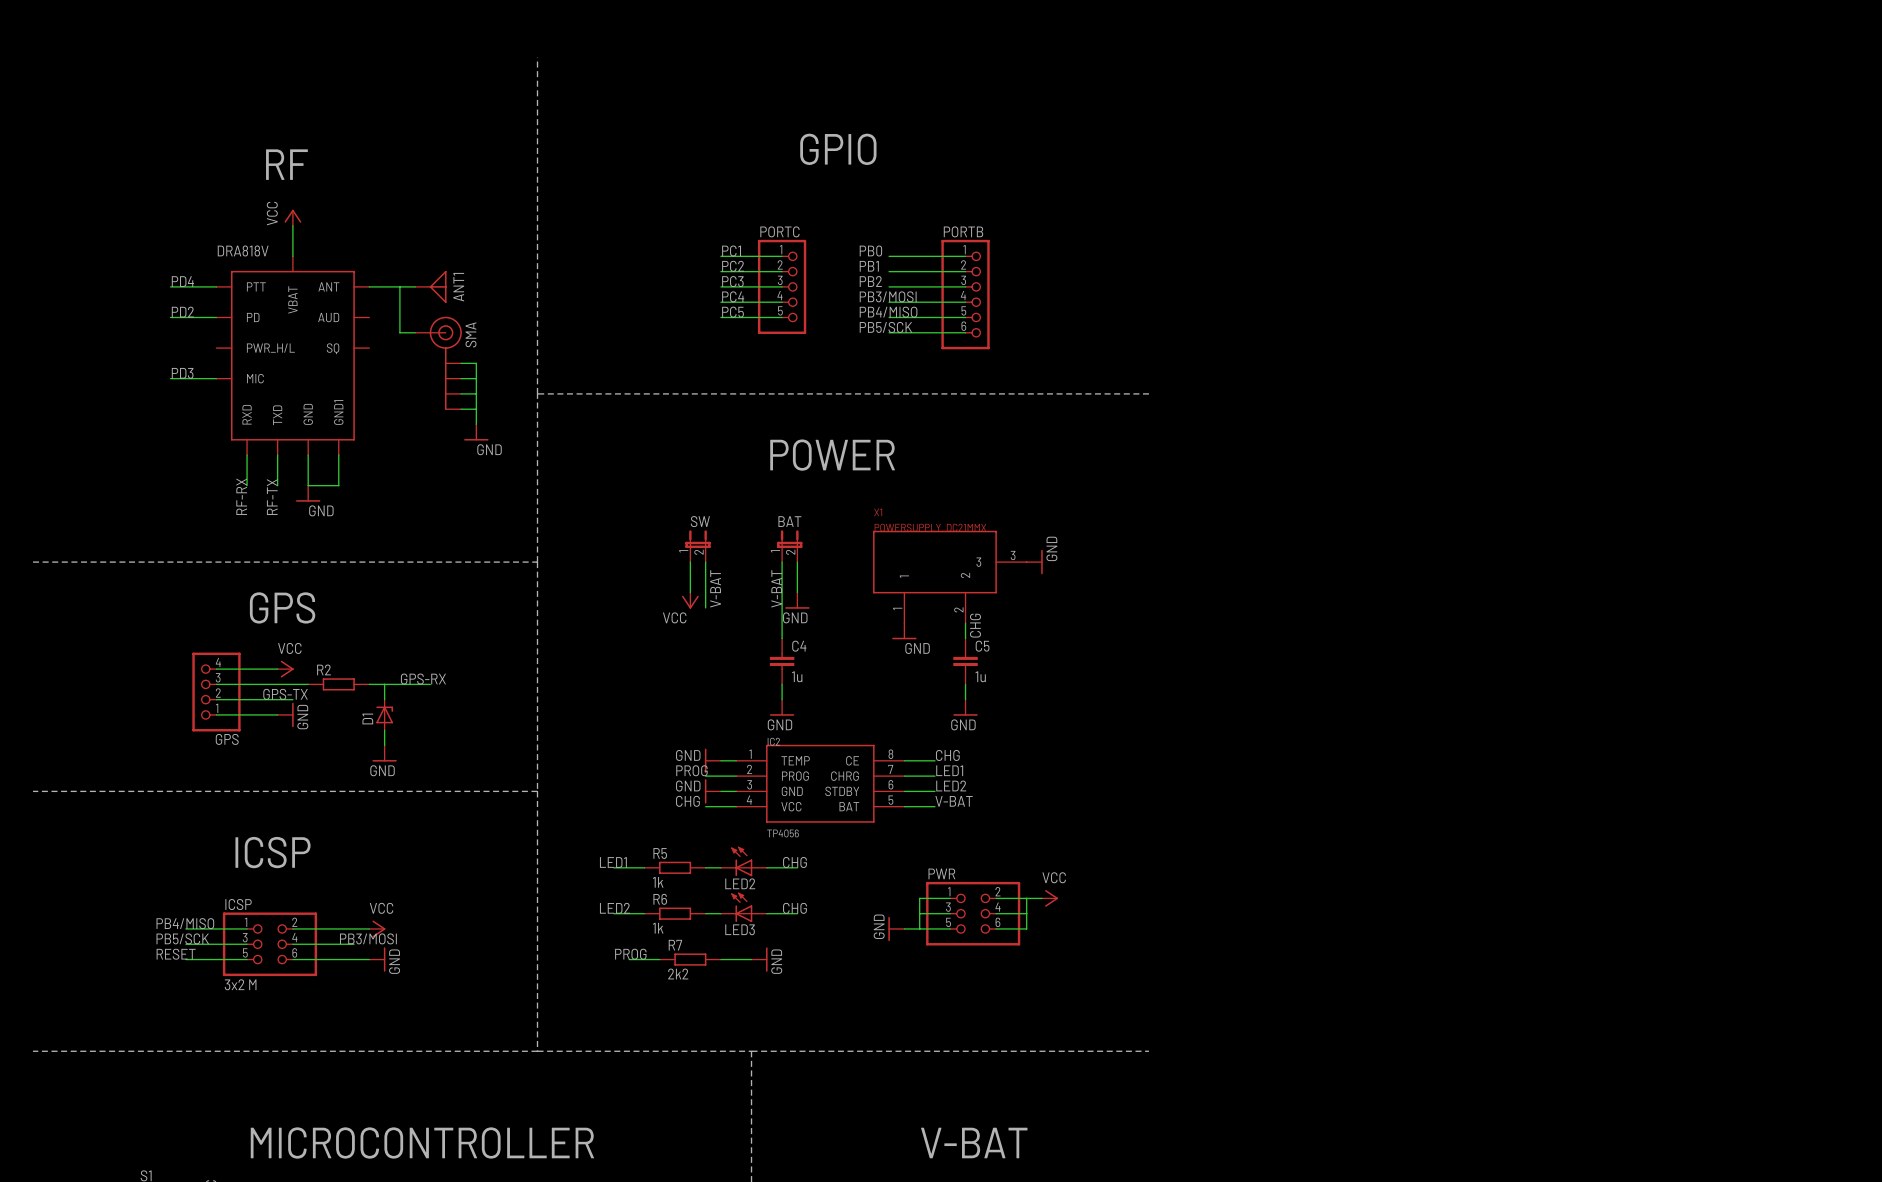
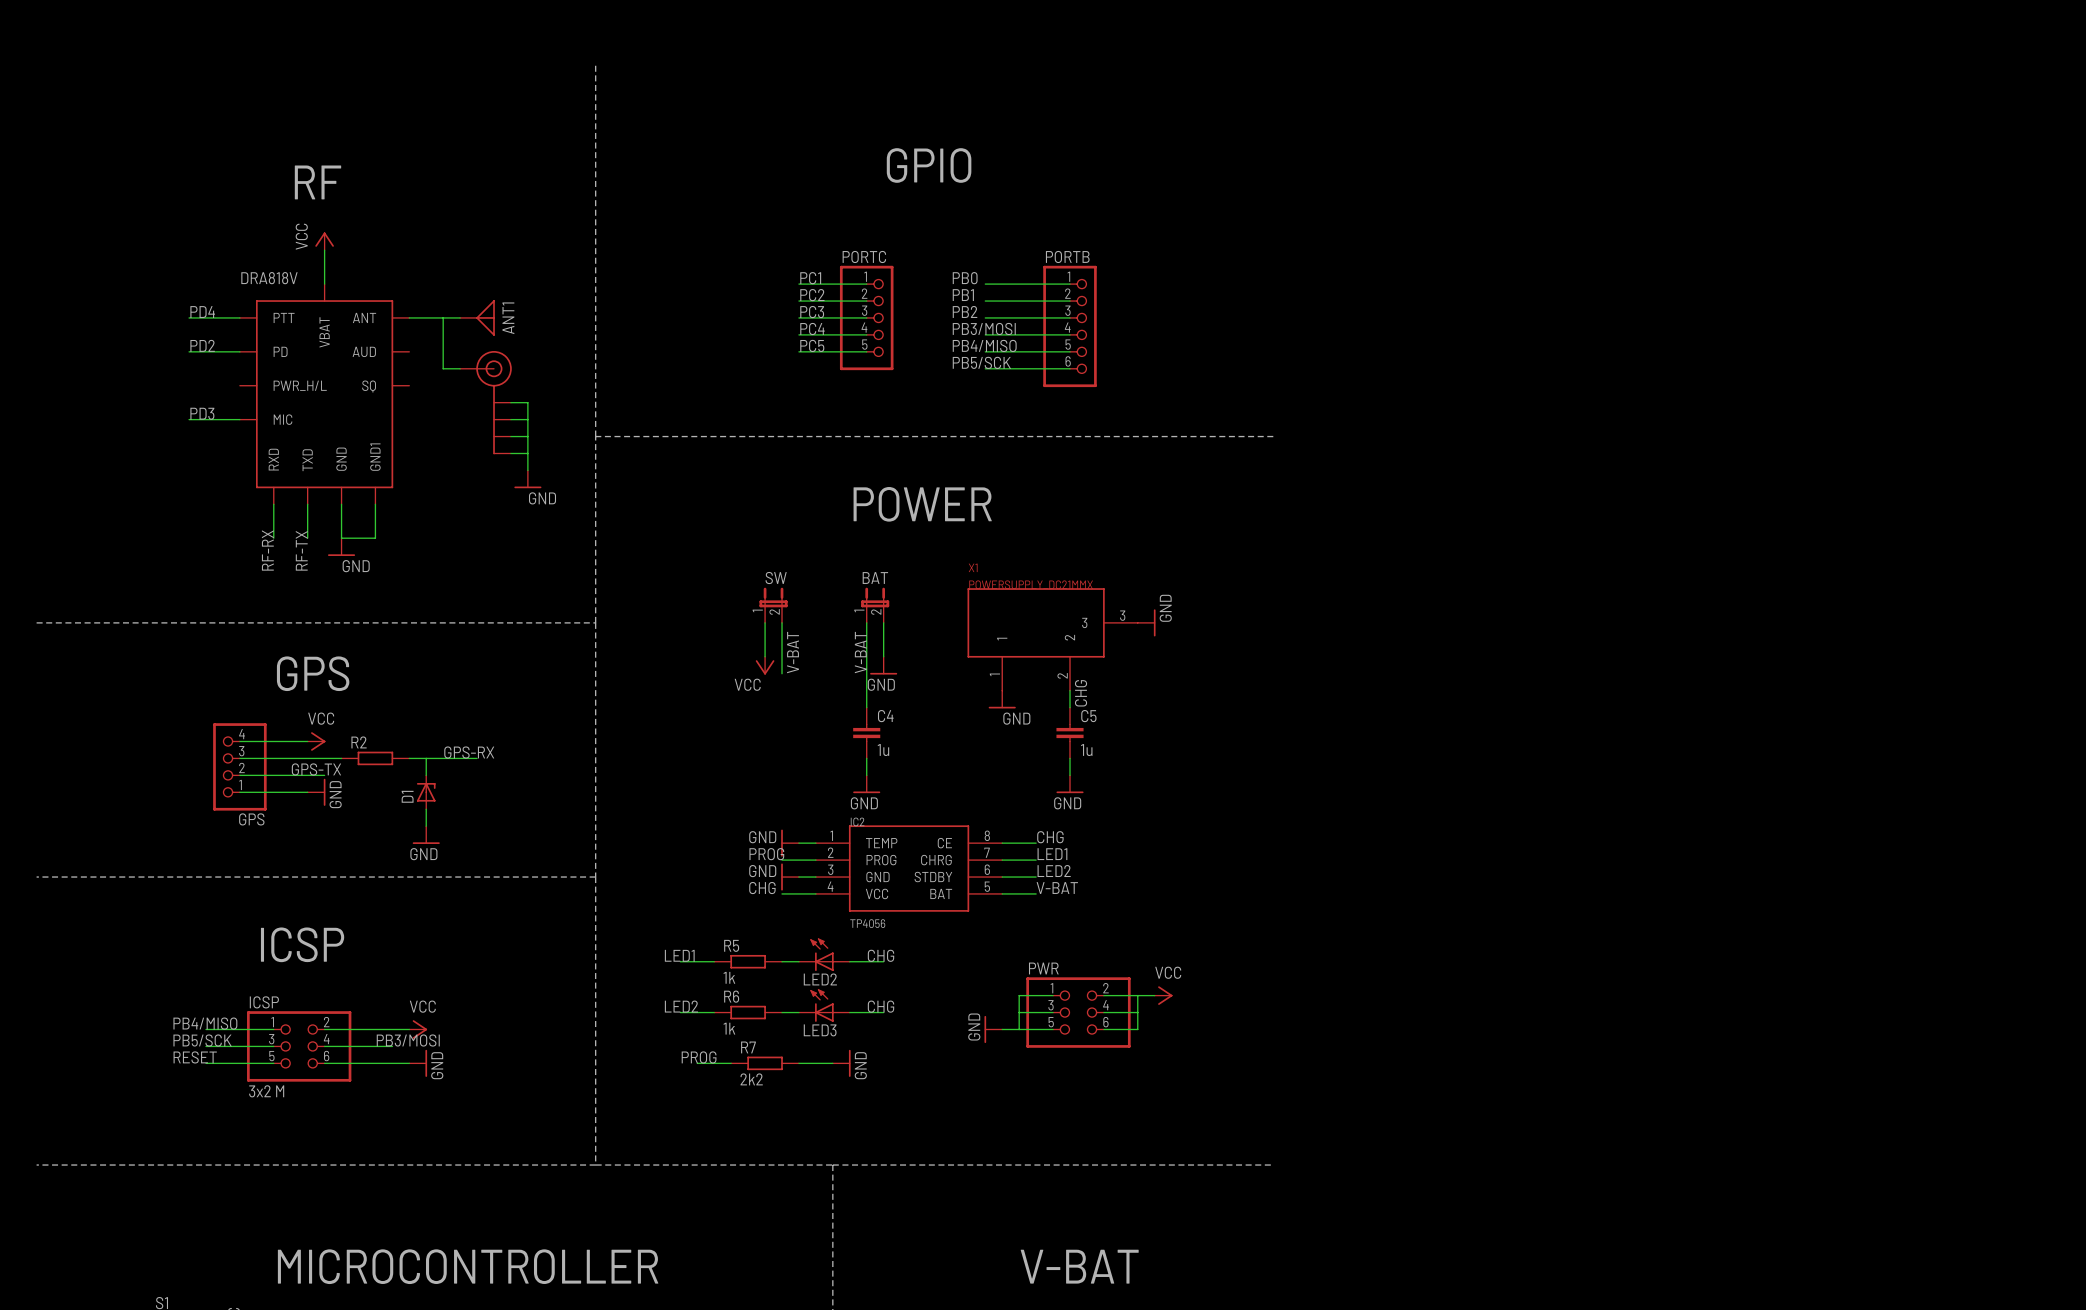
text: SMA (471, 334) -> none

